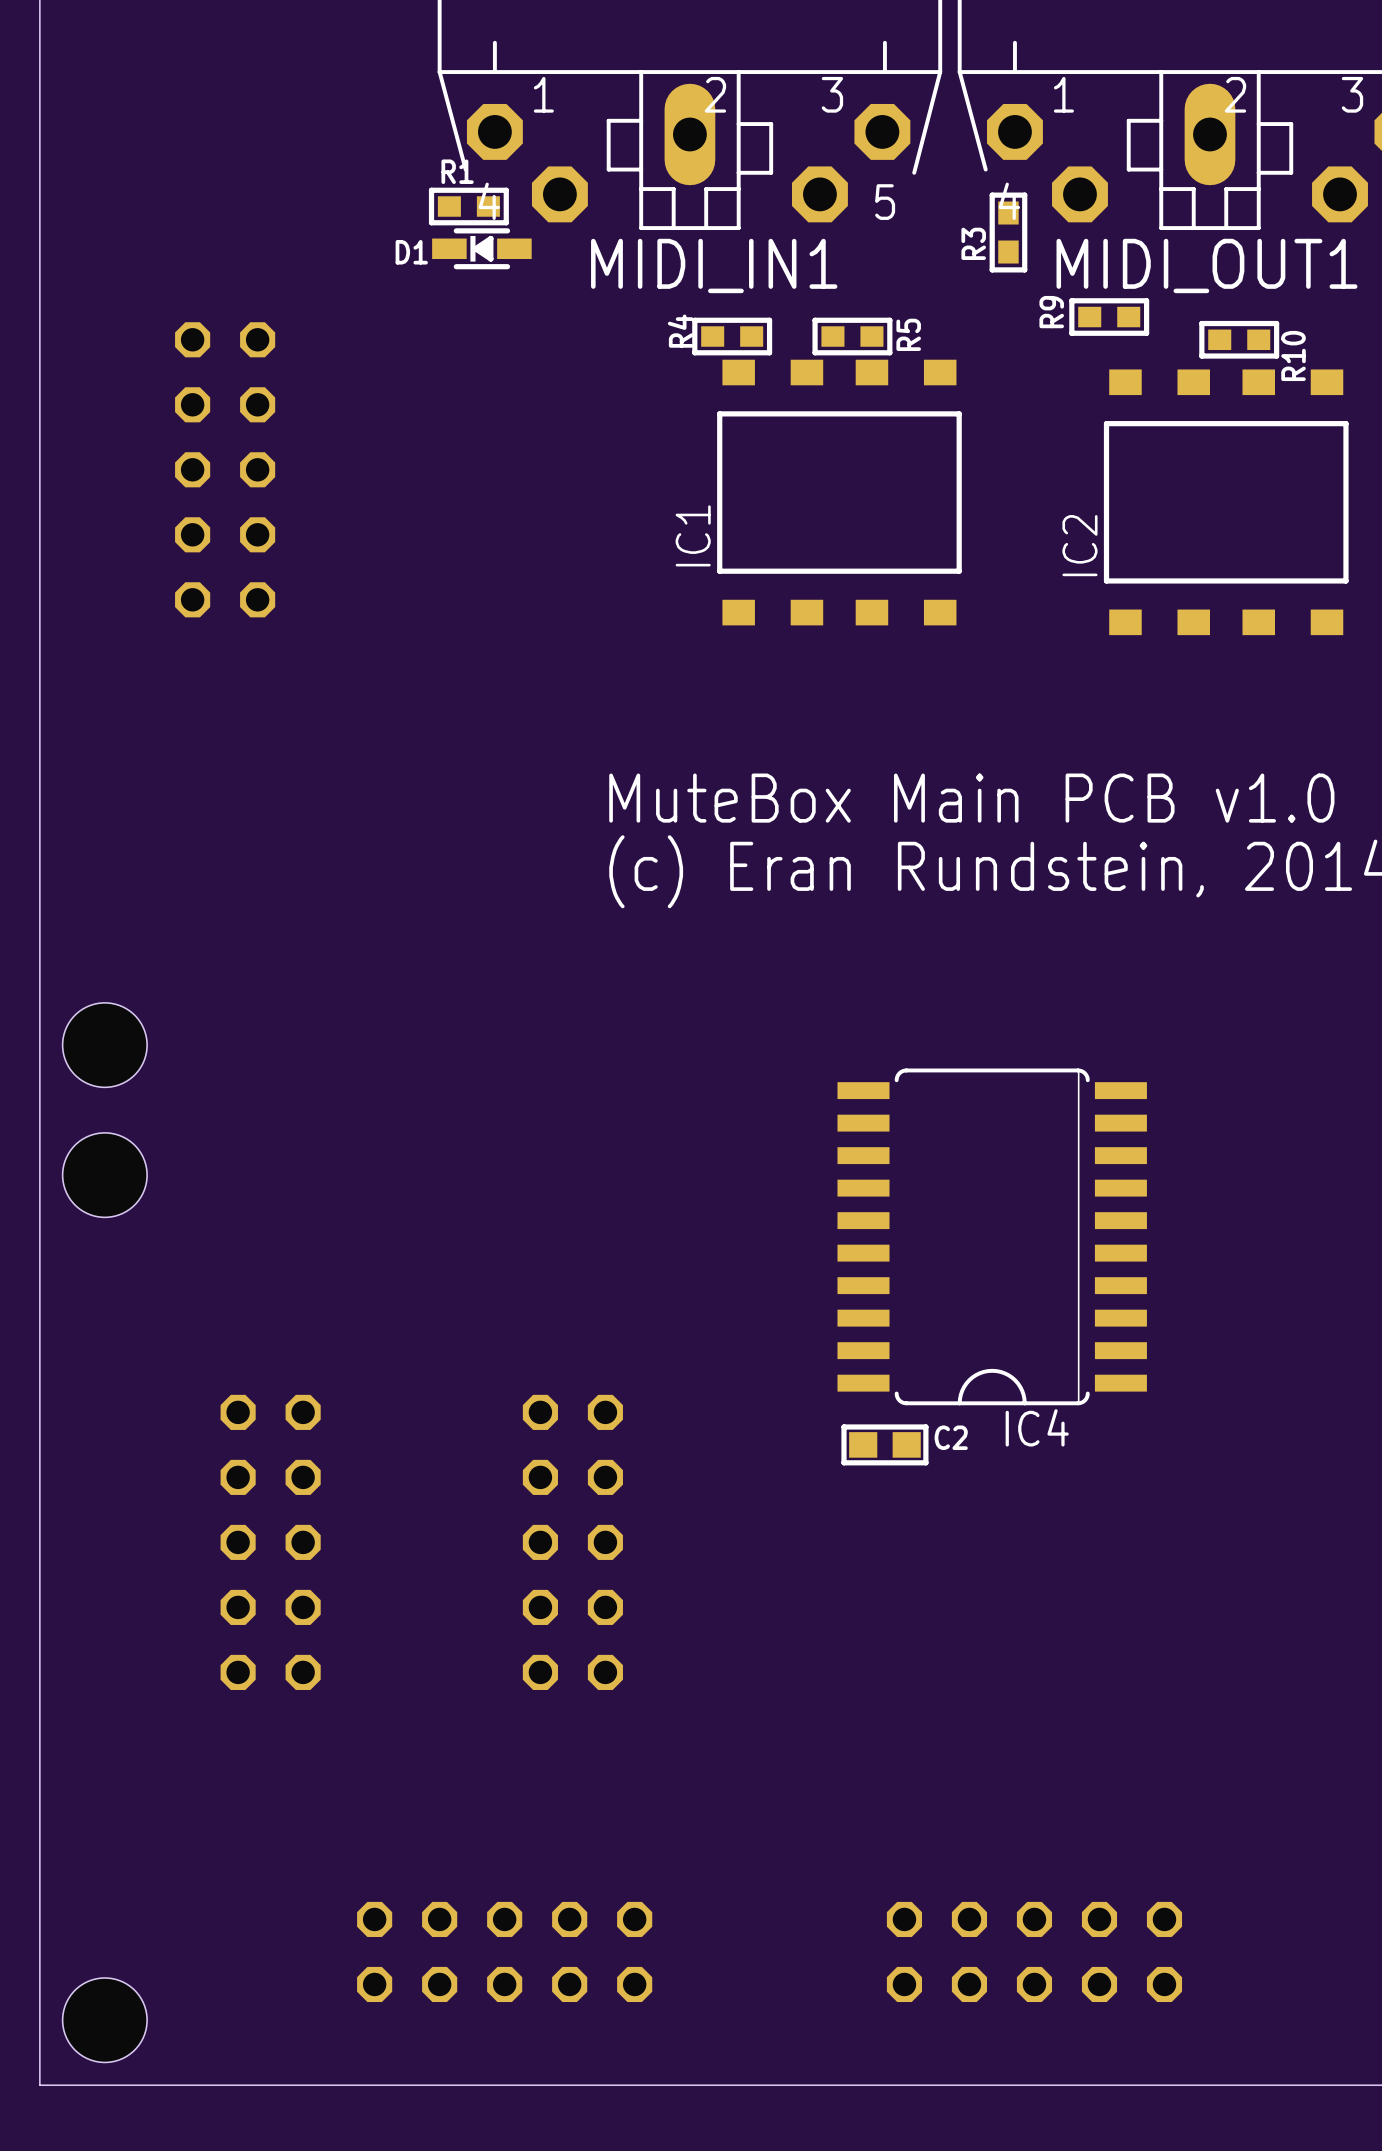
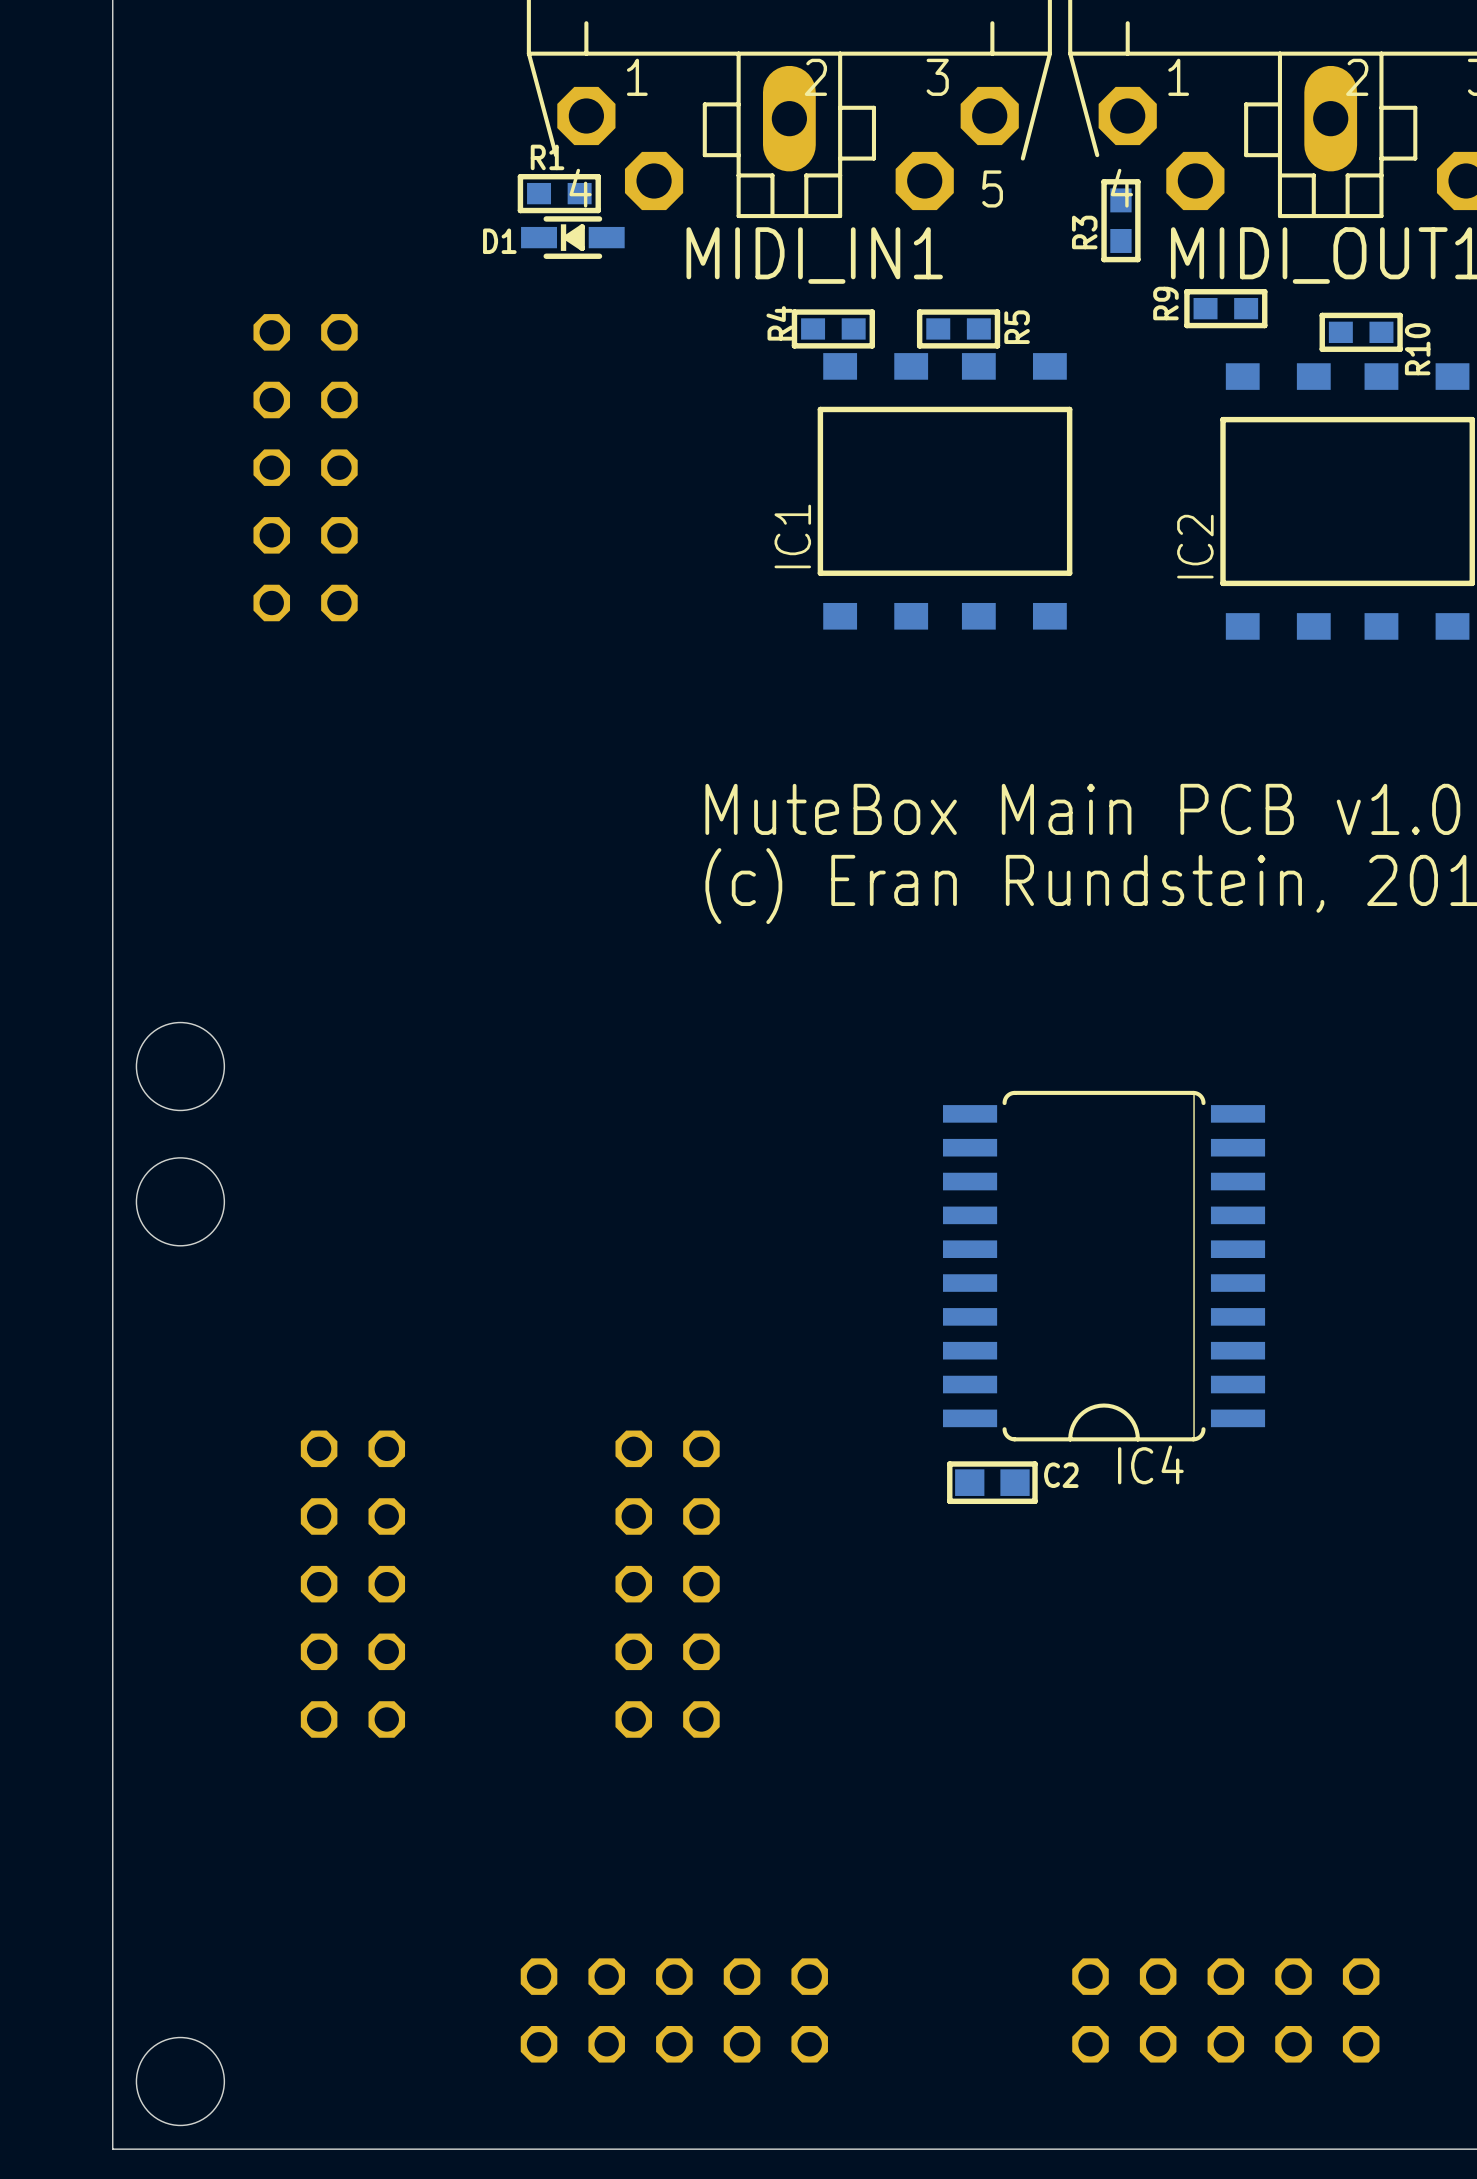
part position: (504, 1951) -> (674, 2010)
part position: (1034, 1951) -> (1225, 2010)

